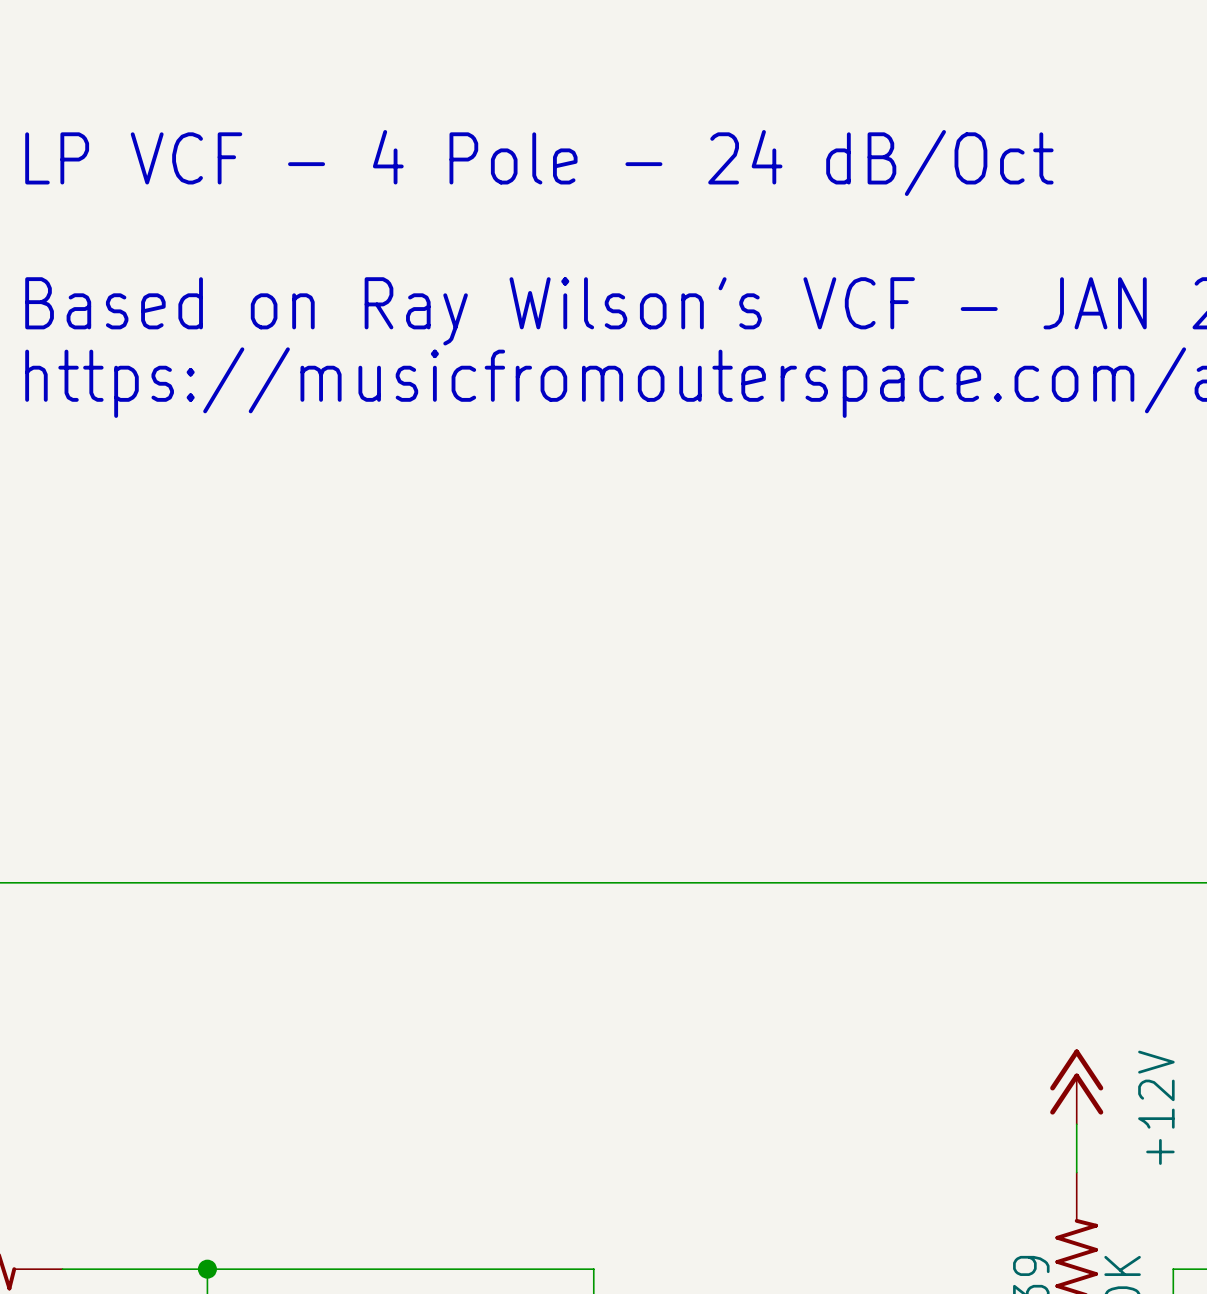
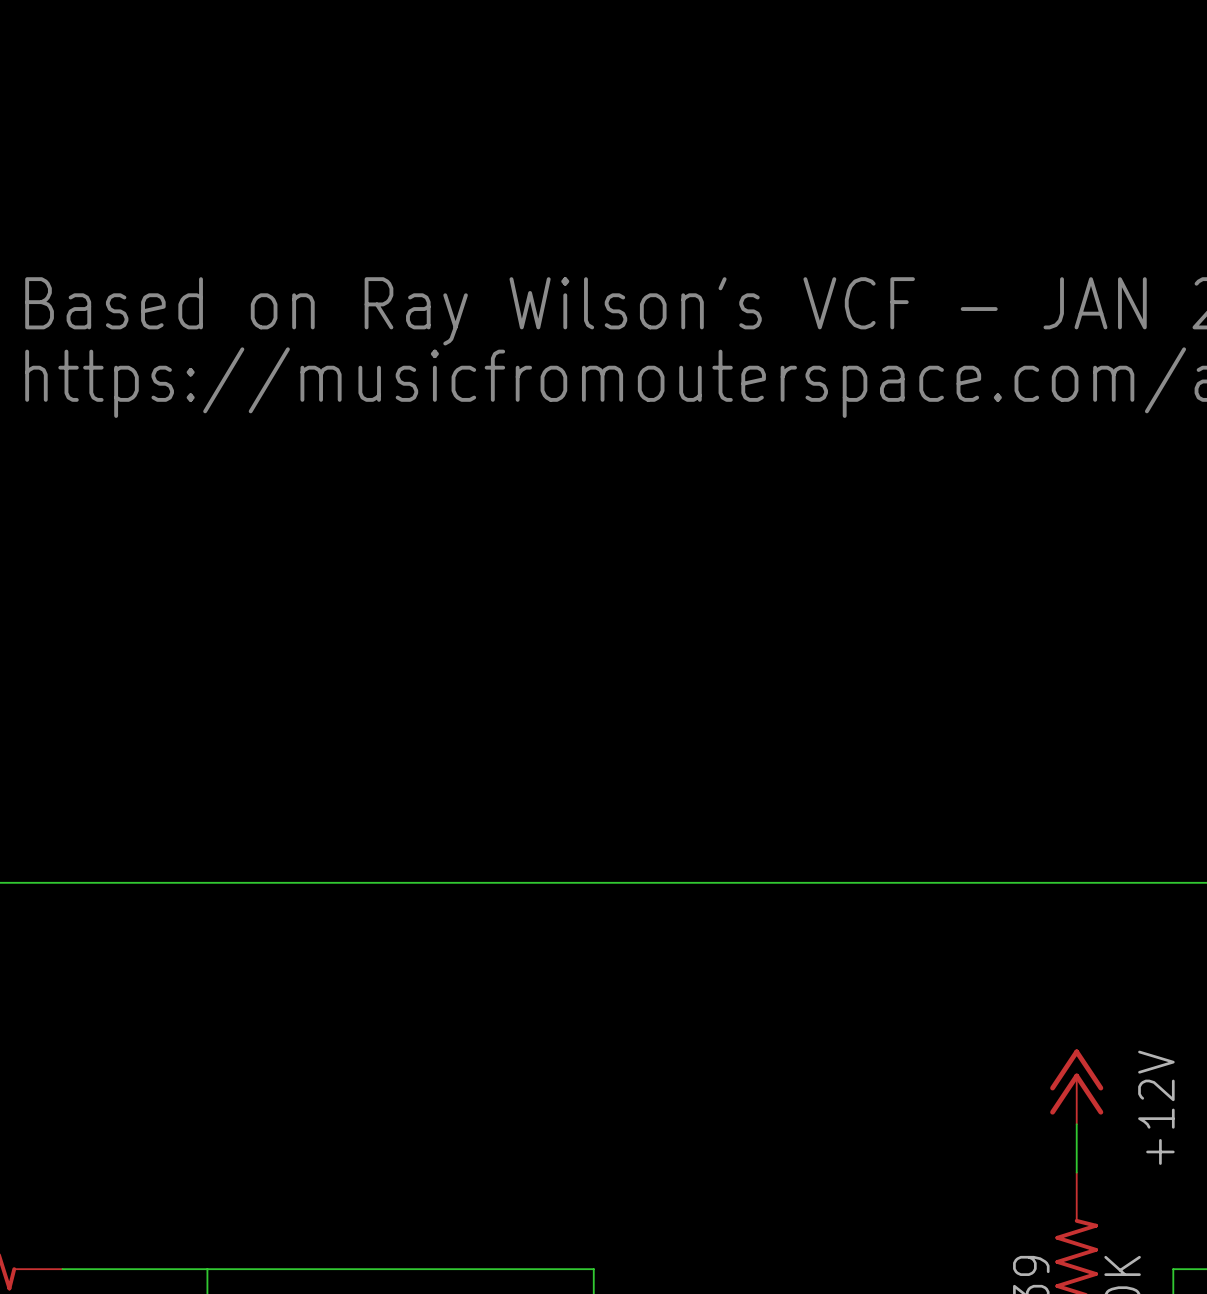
text: LP VCF - 4 Pole - 24 dB/Oct (539, 163) -> none
junction: (207, 1269) -> none

